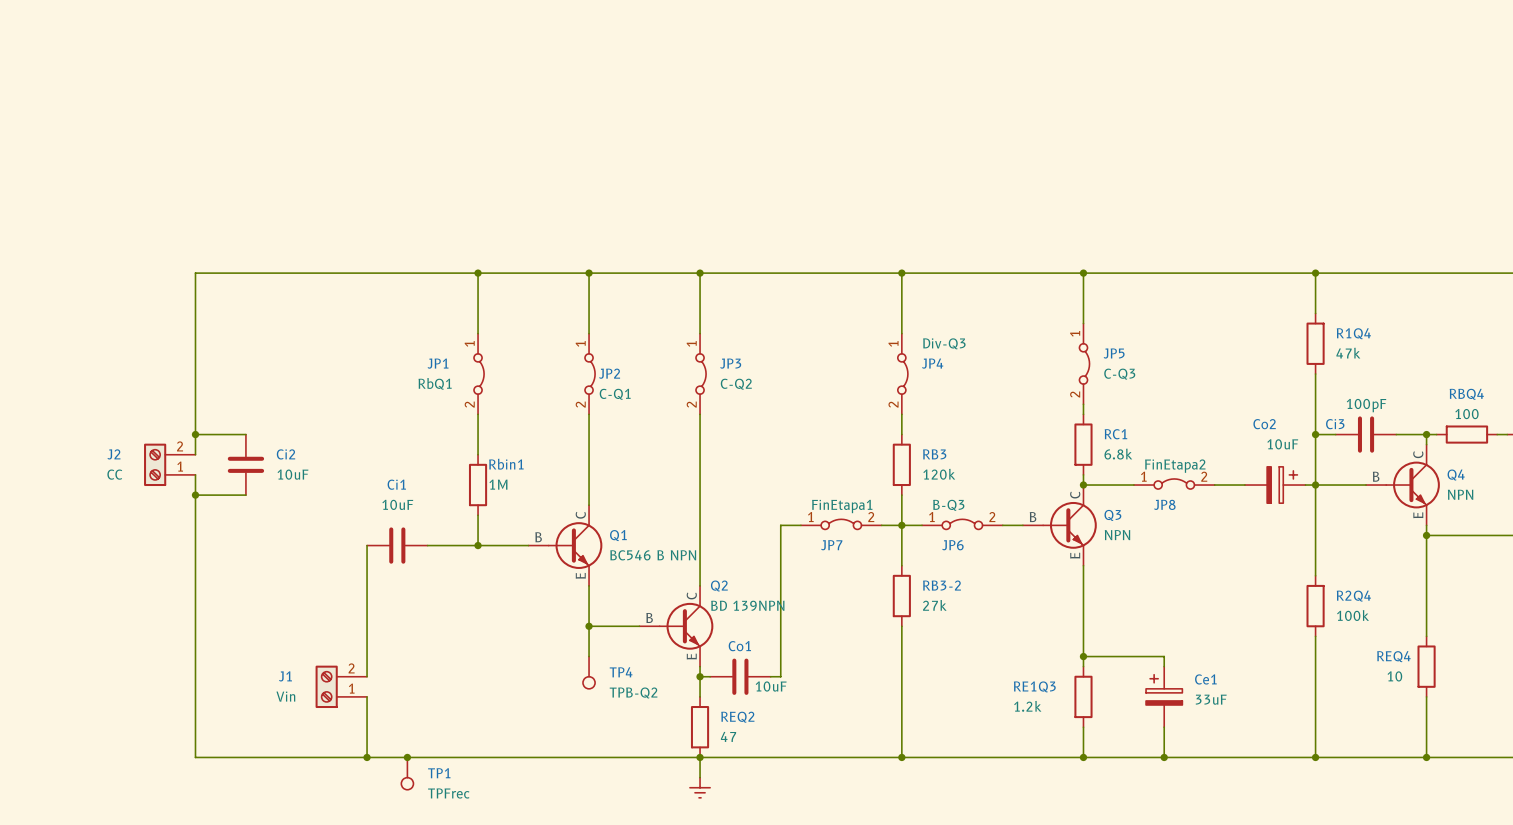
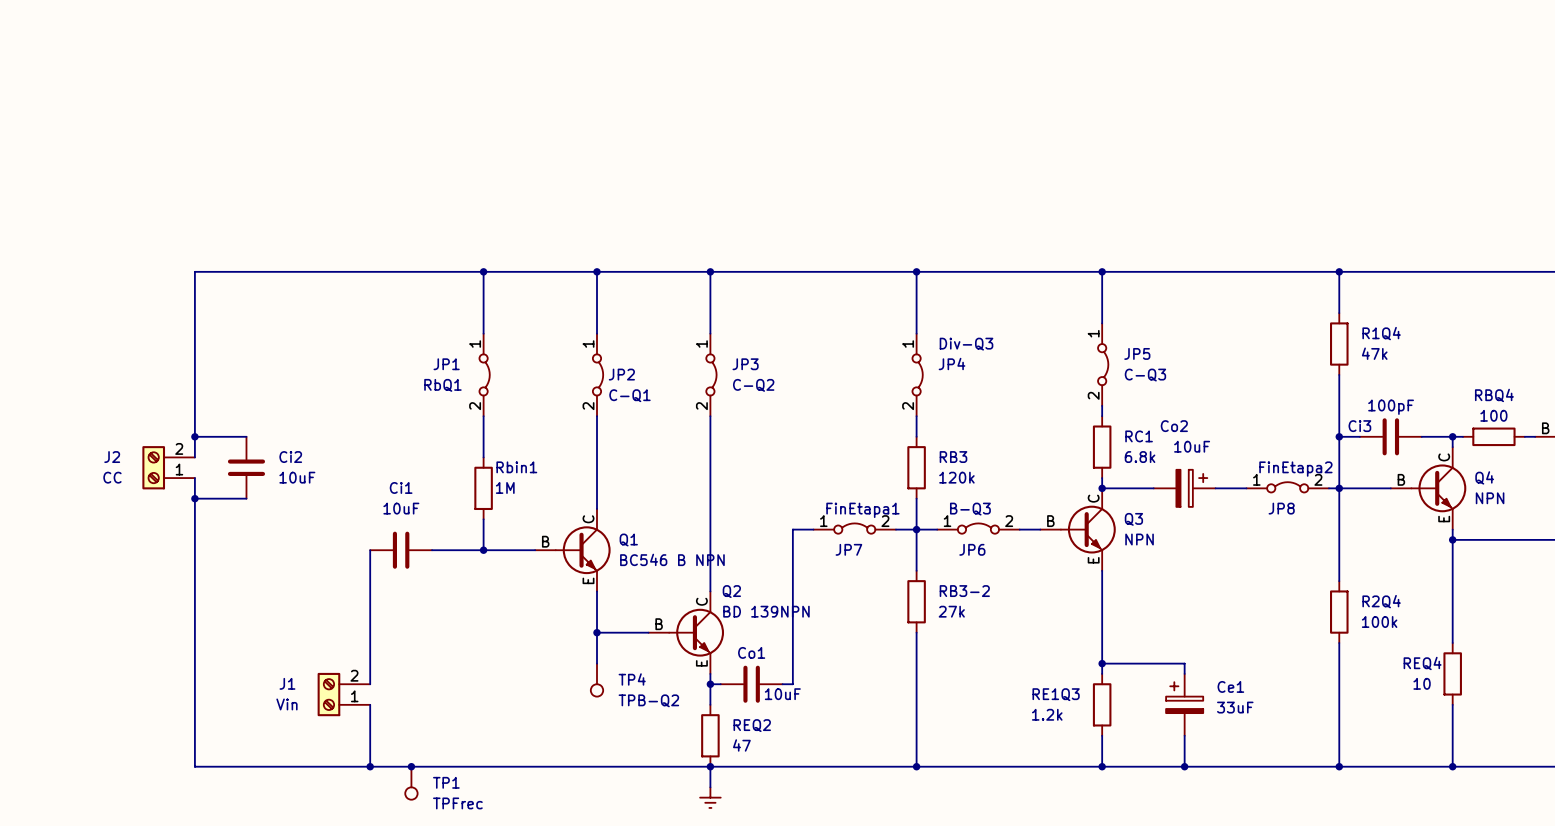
JP8 position: (1174, 484) -> (1287, 487)
Co2 position: (1275, 485) -> (1184, 488)

